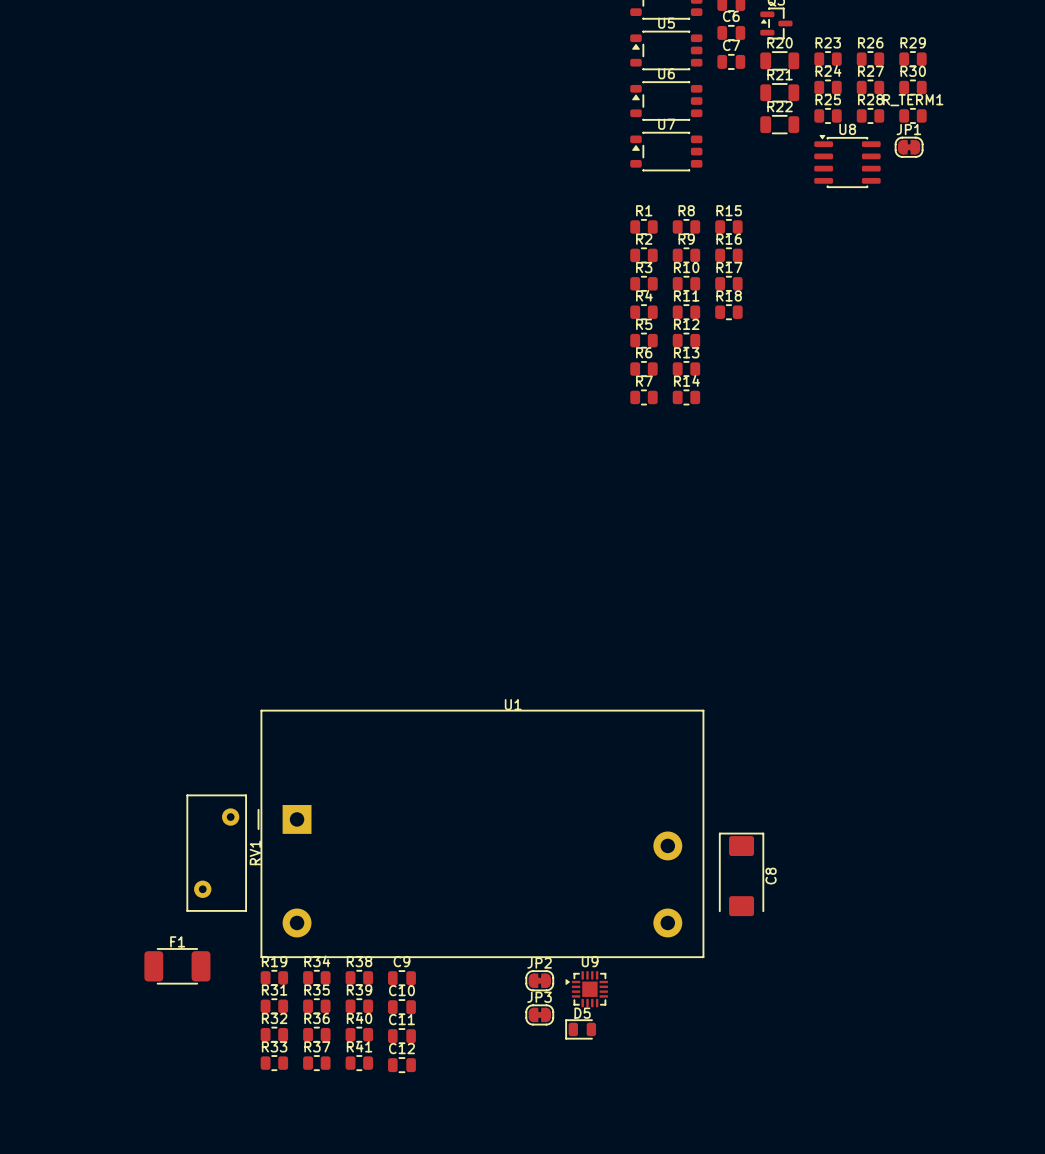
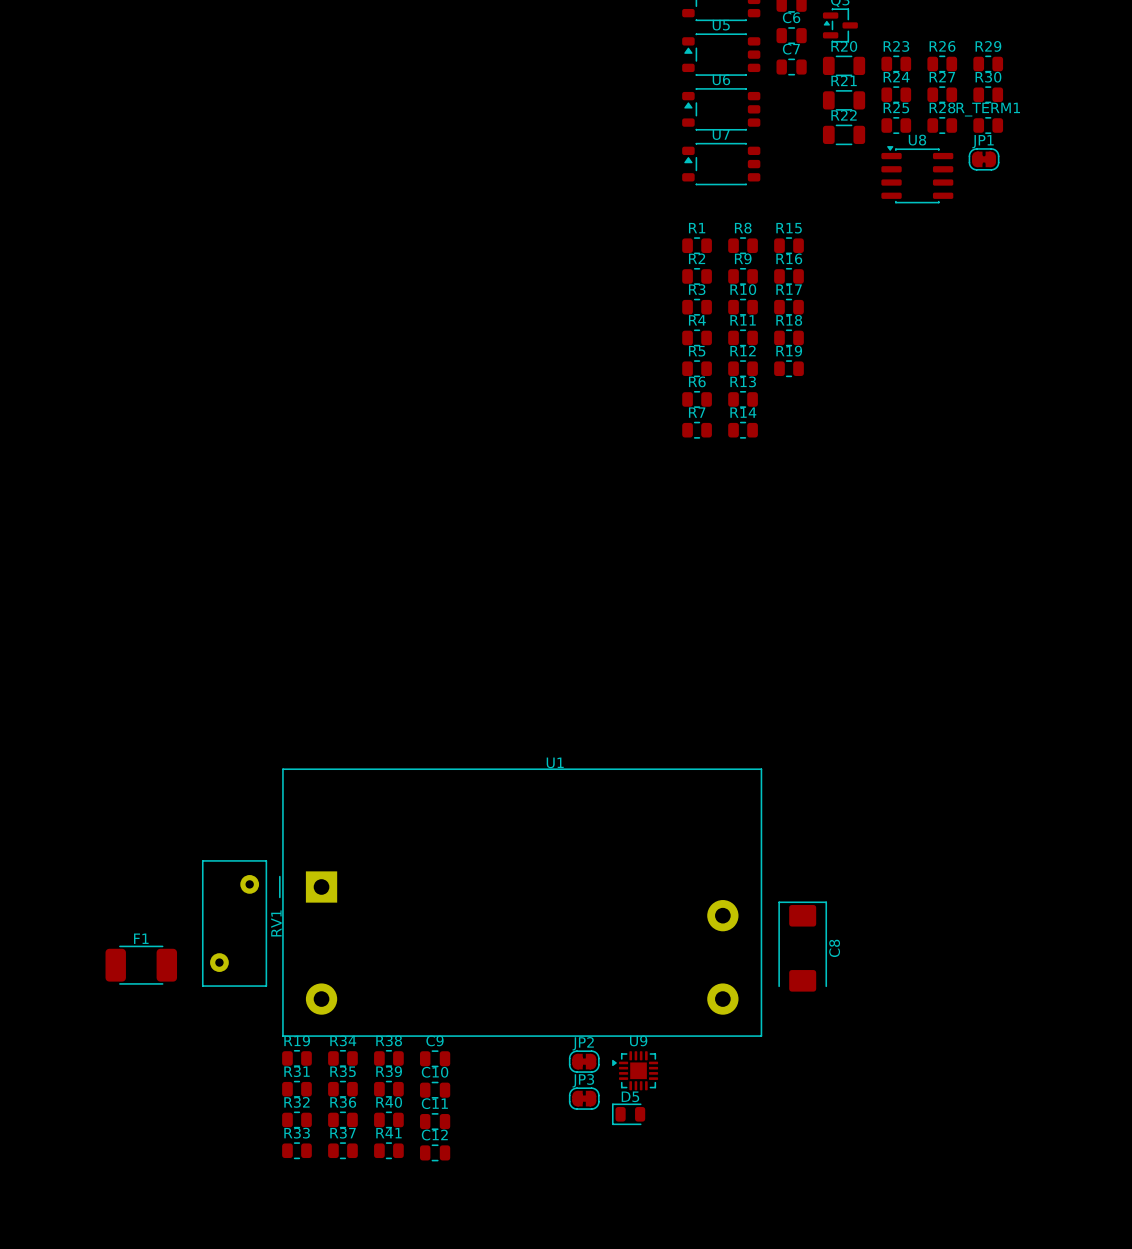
R19: none -> (789, 368)
F1 position: (177, 966) -> (141, 965)

